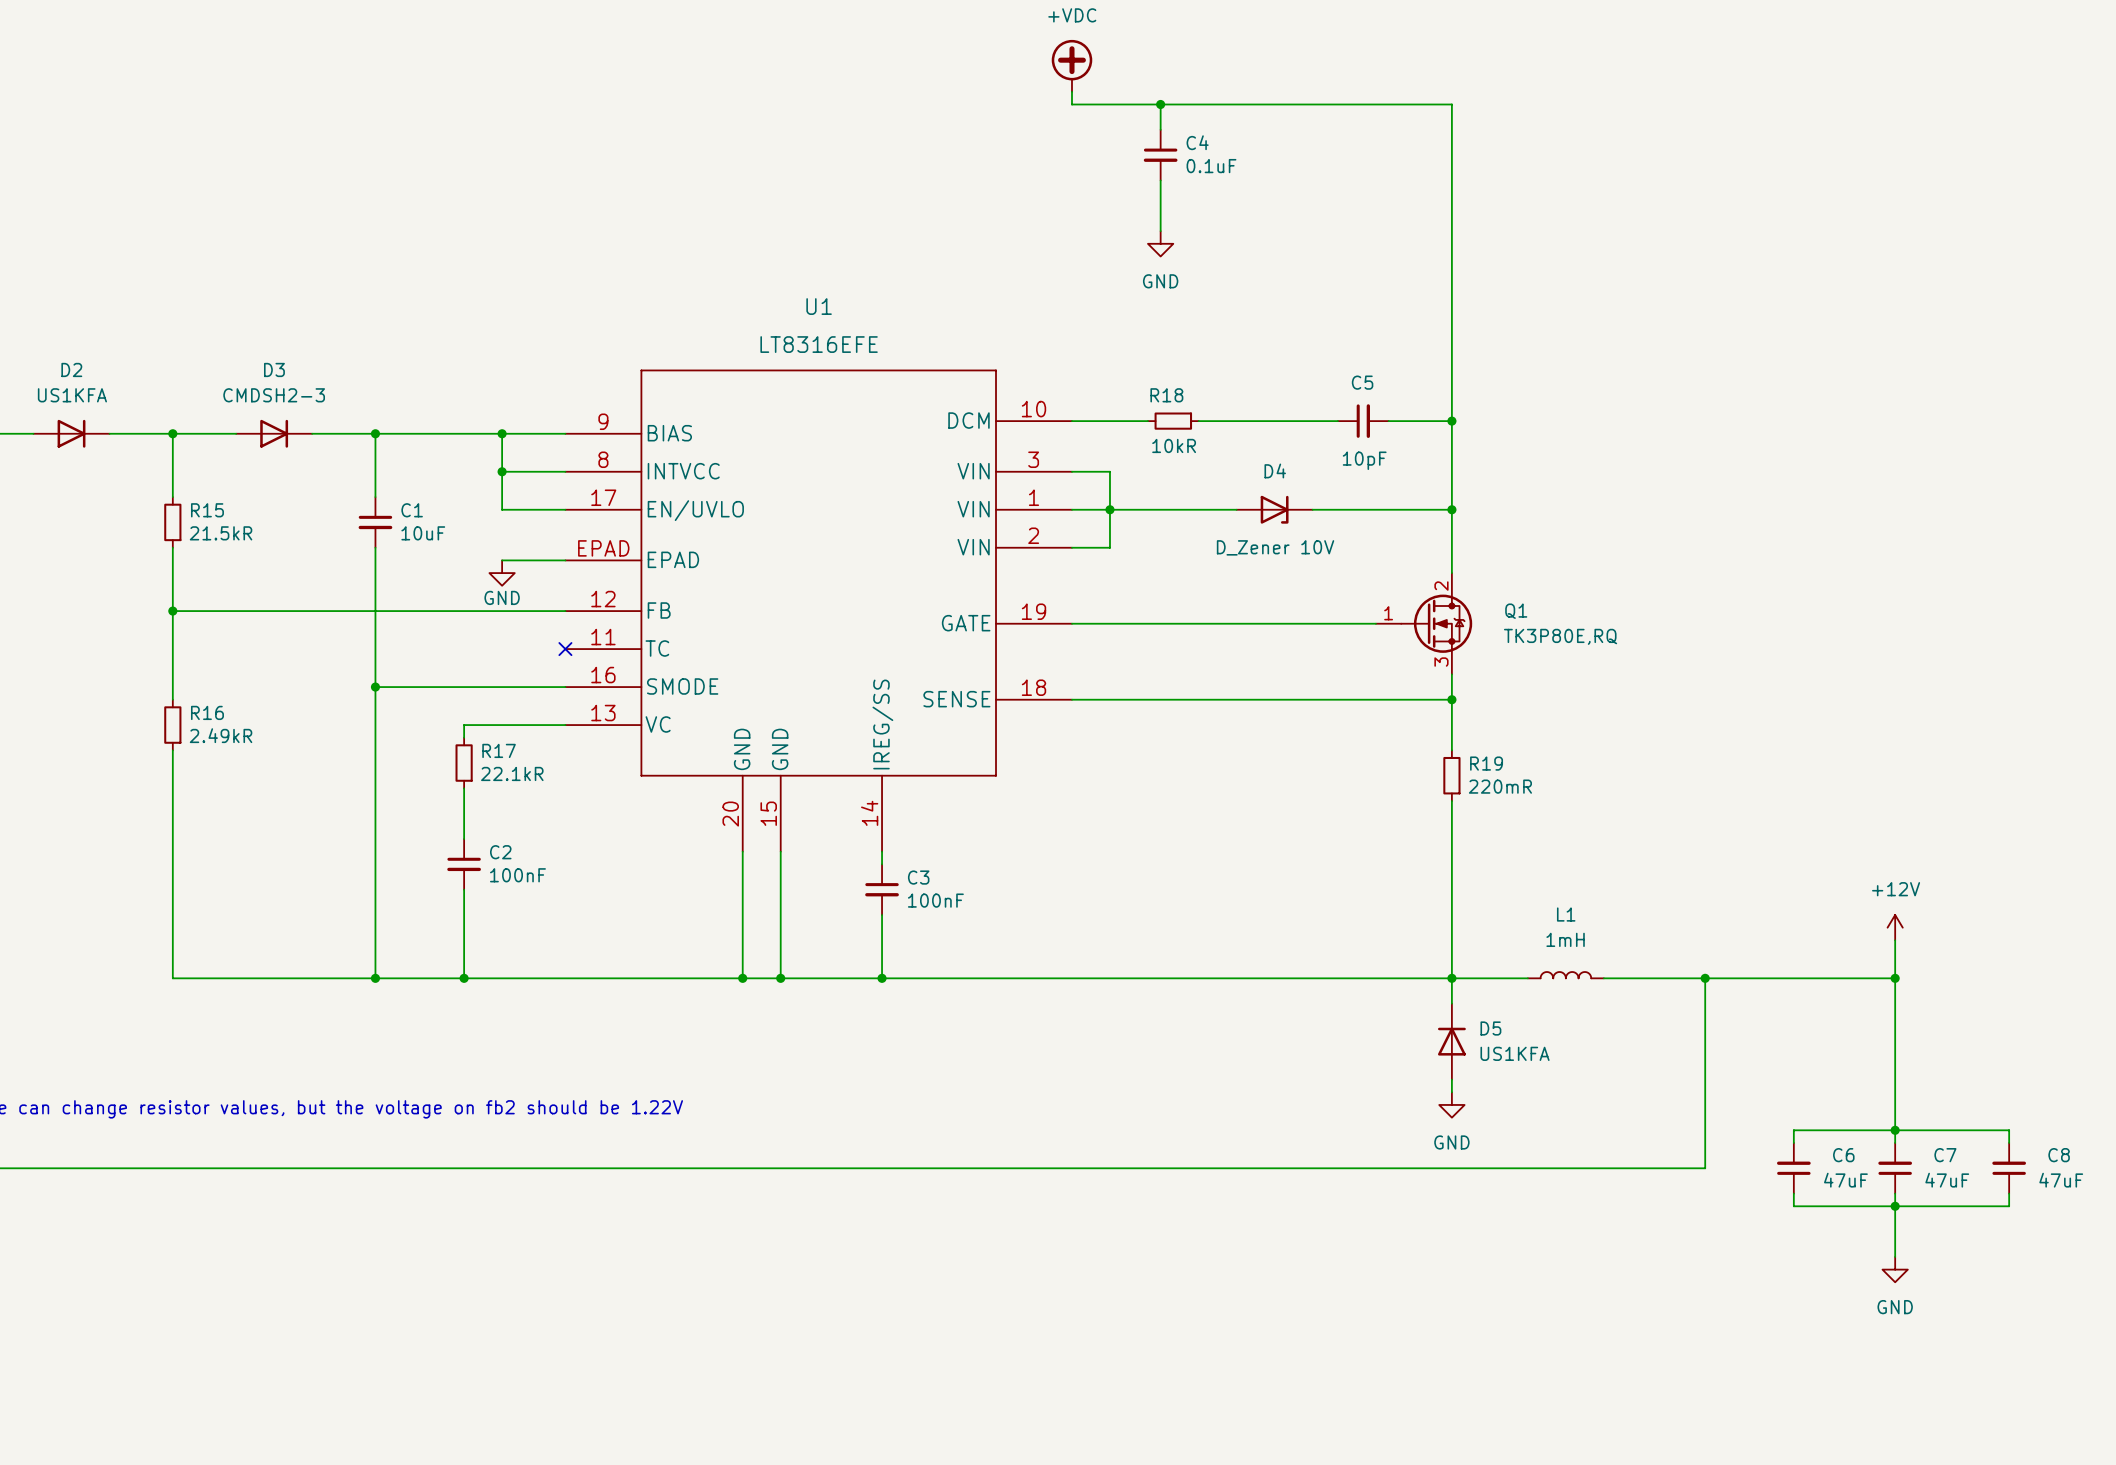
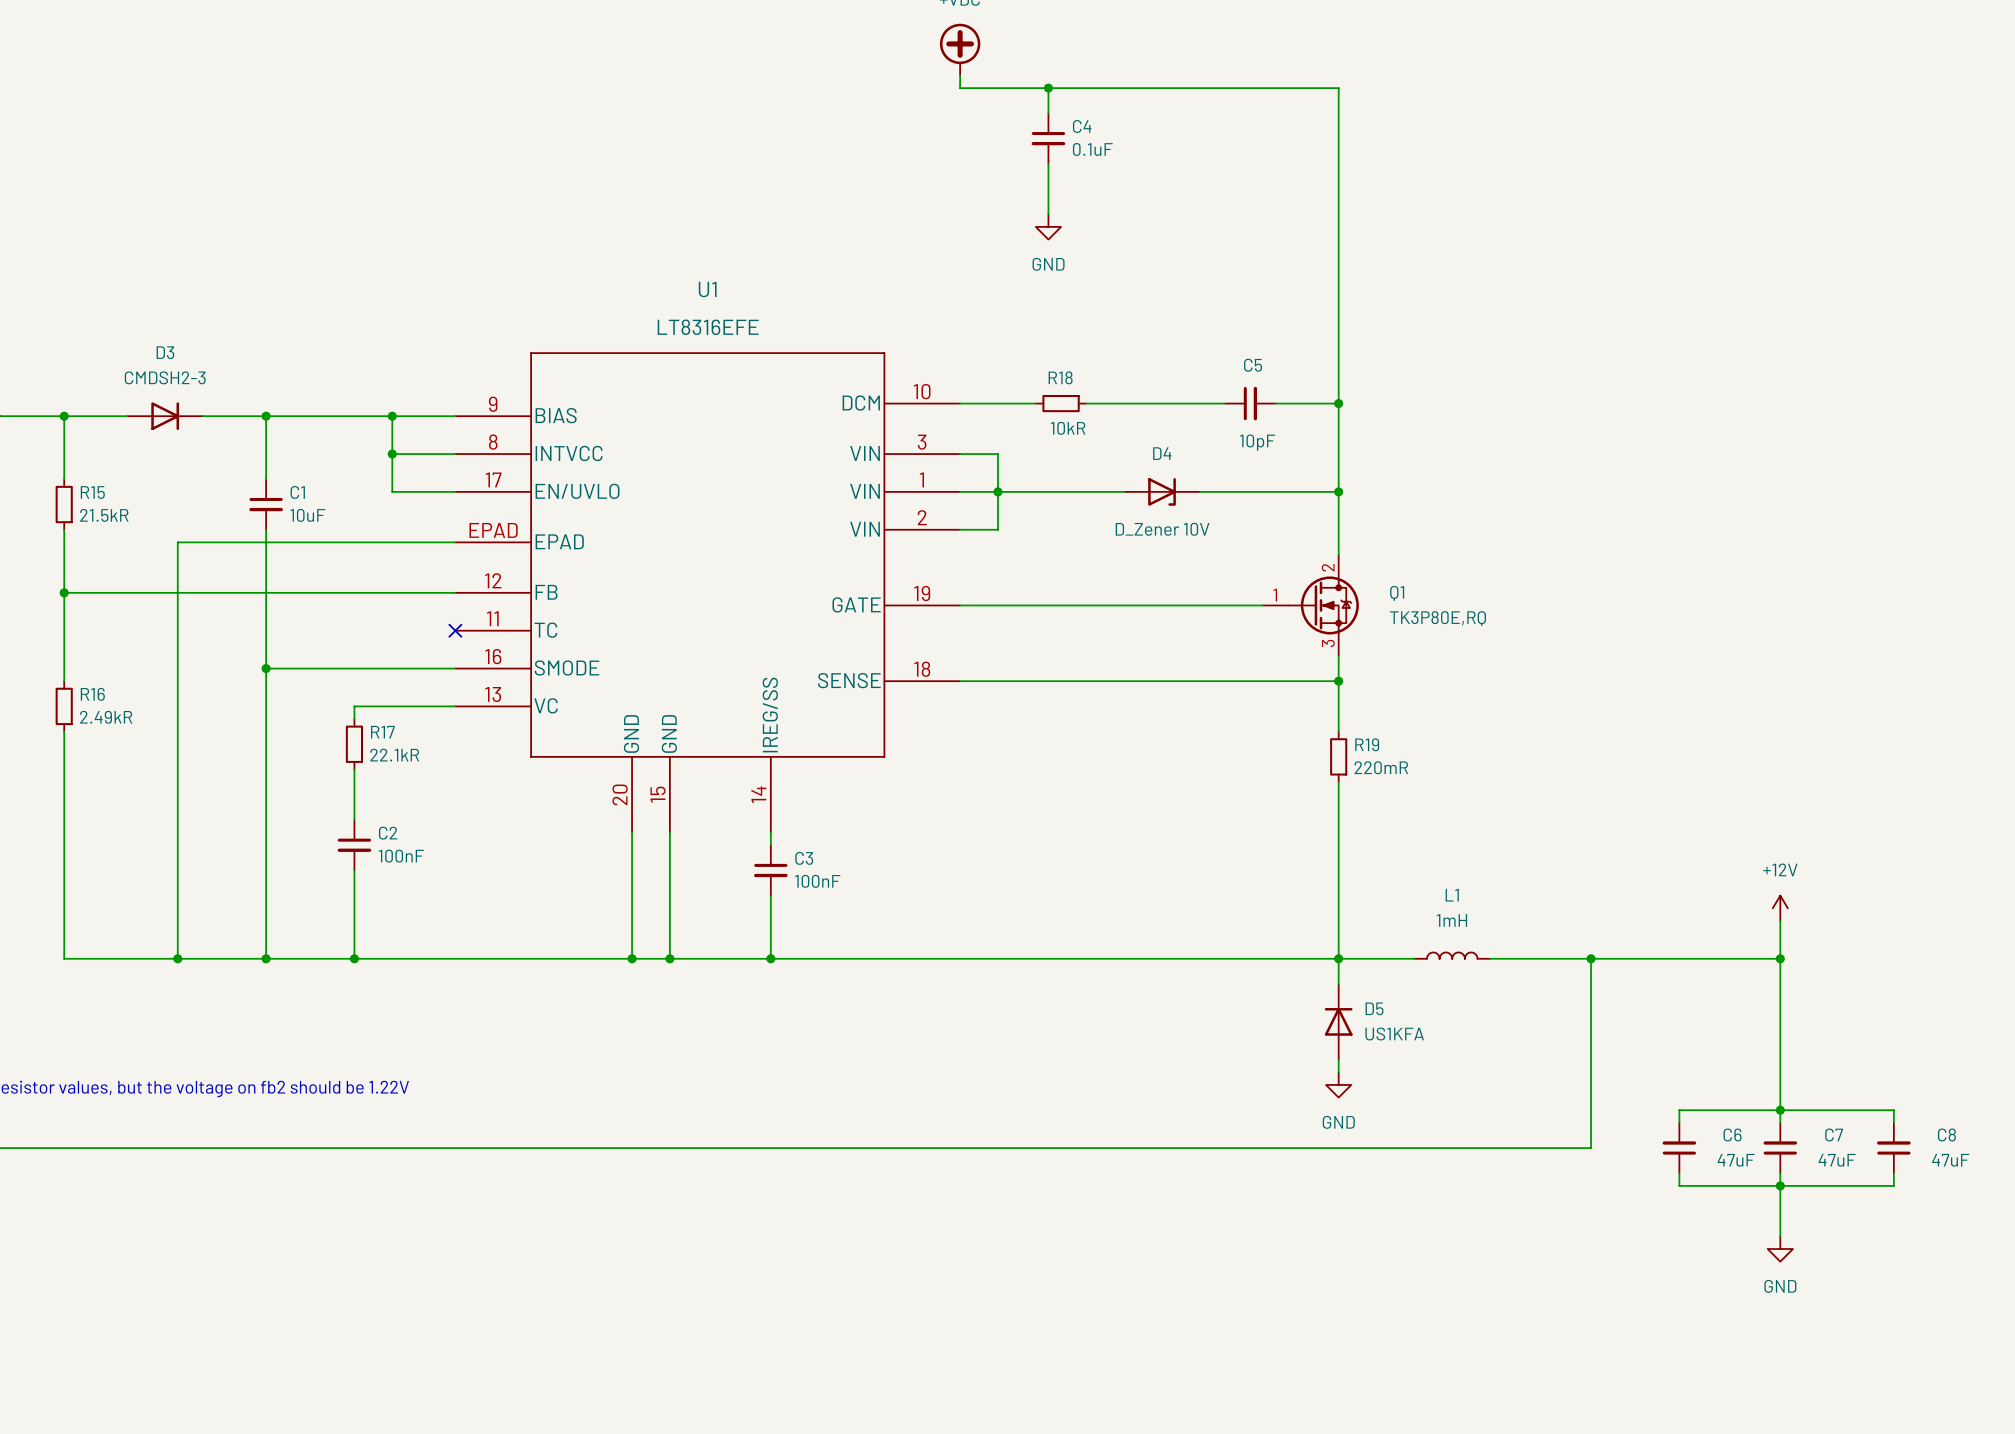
wire: none -> (392, 542) (177, 542) (177, 958)
power symbol: GND (502, 573) -> none
junction: none -> (177, 958)

